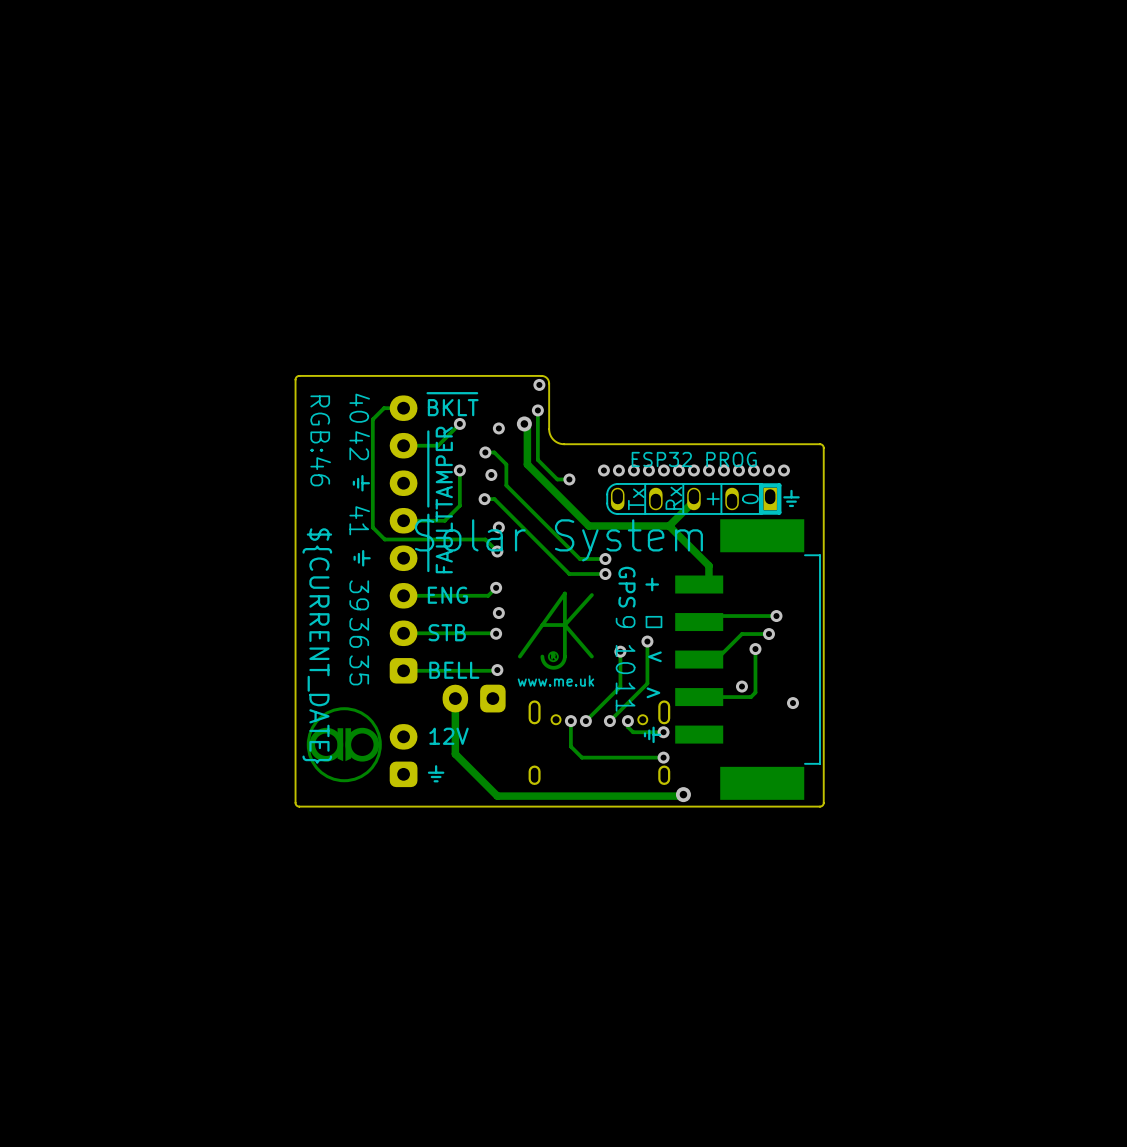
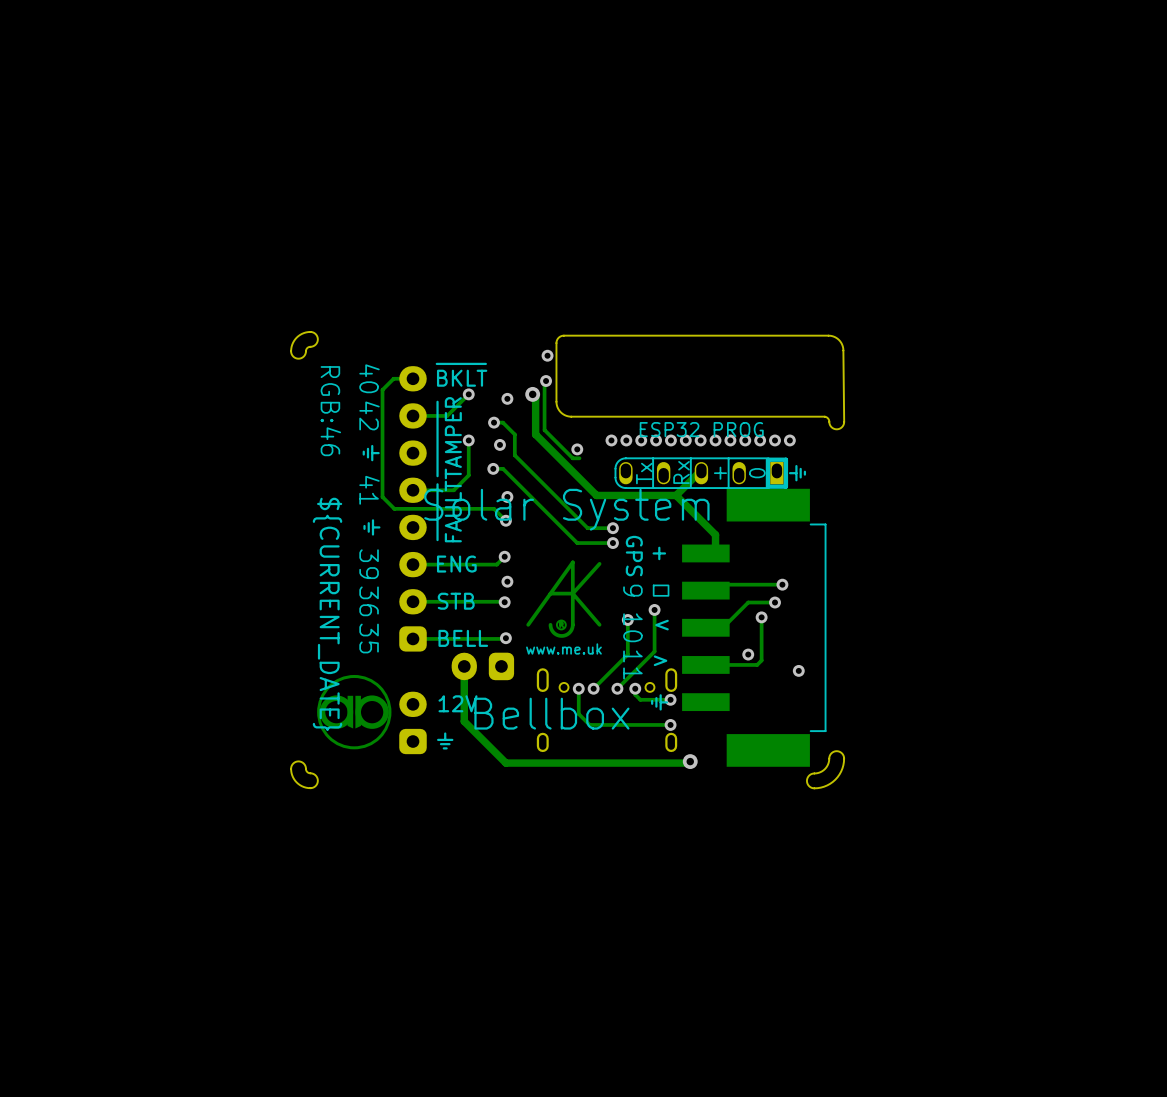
board edge: none -> (310, 331) (302, 333) (294, 340) (291, 351) (294, 357) (302, 357) (307, 348) (316, 343) (316, 335) (310, 331)
board edge: none -> (828, 335) (561, 335) (556, 342) (556, 405) (562, 413) (571, 416) (824, 416) (828, 418) (831, 427) (838, 429) (842, 426) (844, 421) (843, 348) (839, 340) (828, 335)
board edge: (541, 375) (299, 375) (296, 377) (296, 804) (299, 806) (821, 806) (823, 802) (823, 445) (820, 444) (560, 443) (553, 439) (549, 432) (549, 382) (546, 378) (541, 375) -> none
track: (537, 410) (537, 459) (557, 479) (569, 479) -> none
track: none -> (547, 382) (544, 385) (544, 430) (572, 458) (579, 458)
part footprint: [606, 483, 782, 515] -> [614, 457, 789, 489]
text: none -> Bellbox (551, 713)
board edge: none -> (844, 758) (841, 771) (832, 781) (817, 788) (808, 785) (806, 780) (808, 776) (824, 769) (832, 752) (840, 752) (844, 758)
board edge: none -> (305, 768) (307, 772) (314, 774) (317, 777) (317, 783) (313, 787) (300, 785) (292, 775) (291, 767) (295, 762) (301, 762) (305, 768)

